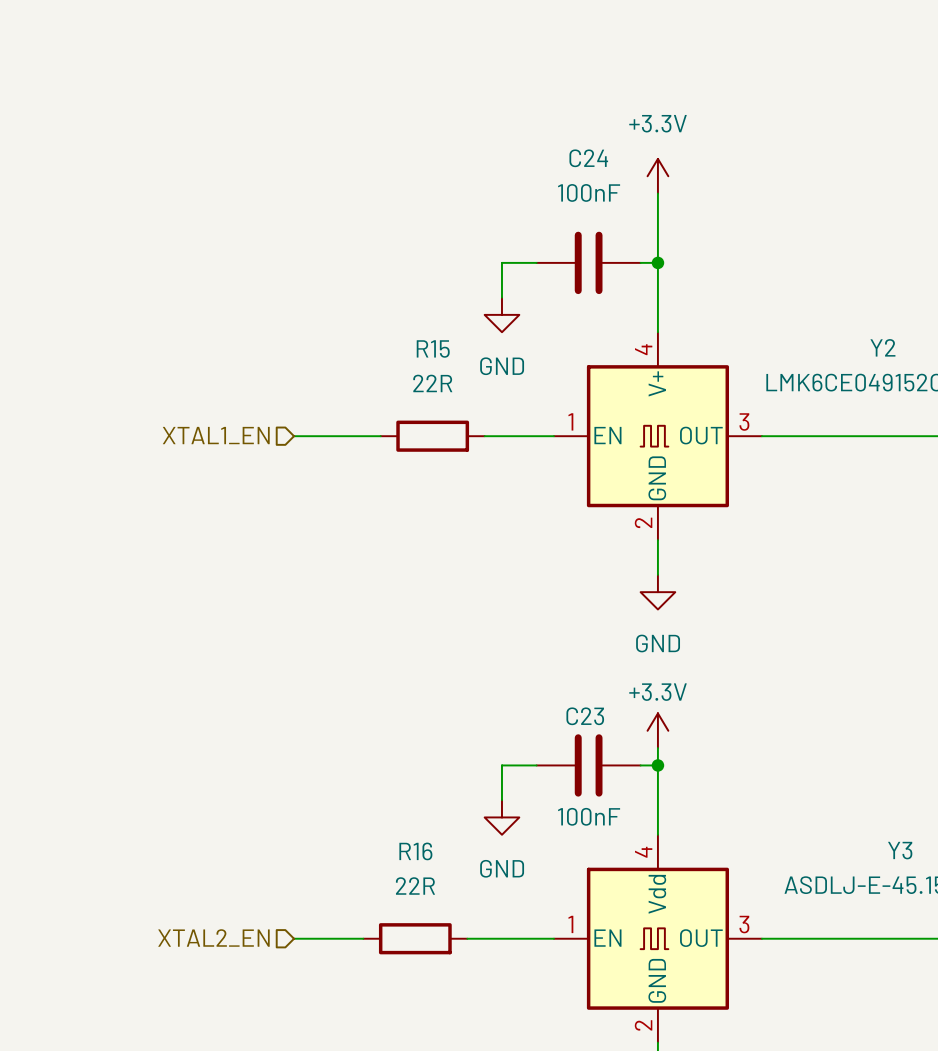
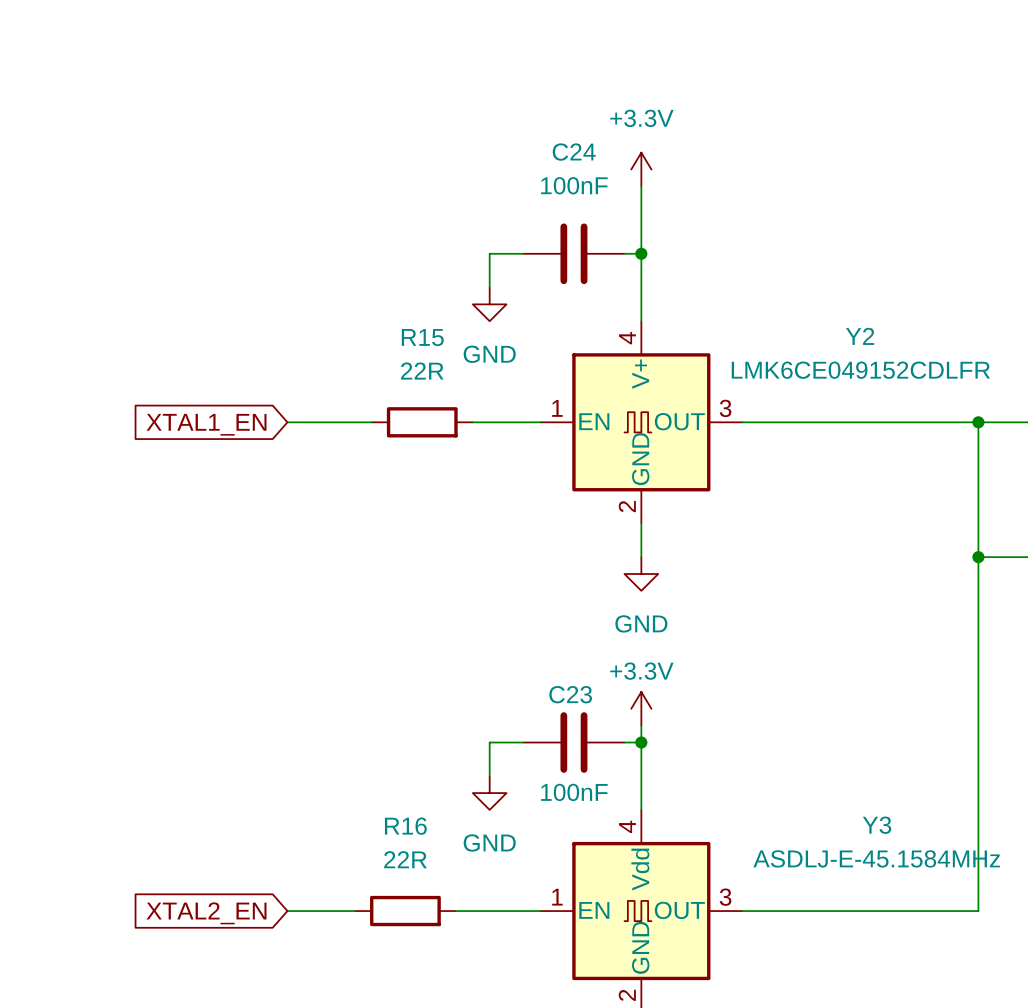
hierarchical label: XTAL1_EN (216, 435) -> none
global label: none -> XTAL1_EN (206, 424)
hierarchical label: XTAL2_EN (213, 937) -> none
global label: none -> XTAL2_EN (206, 913)

